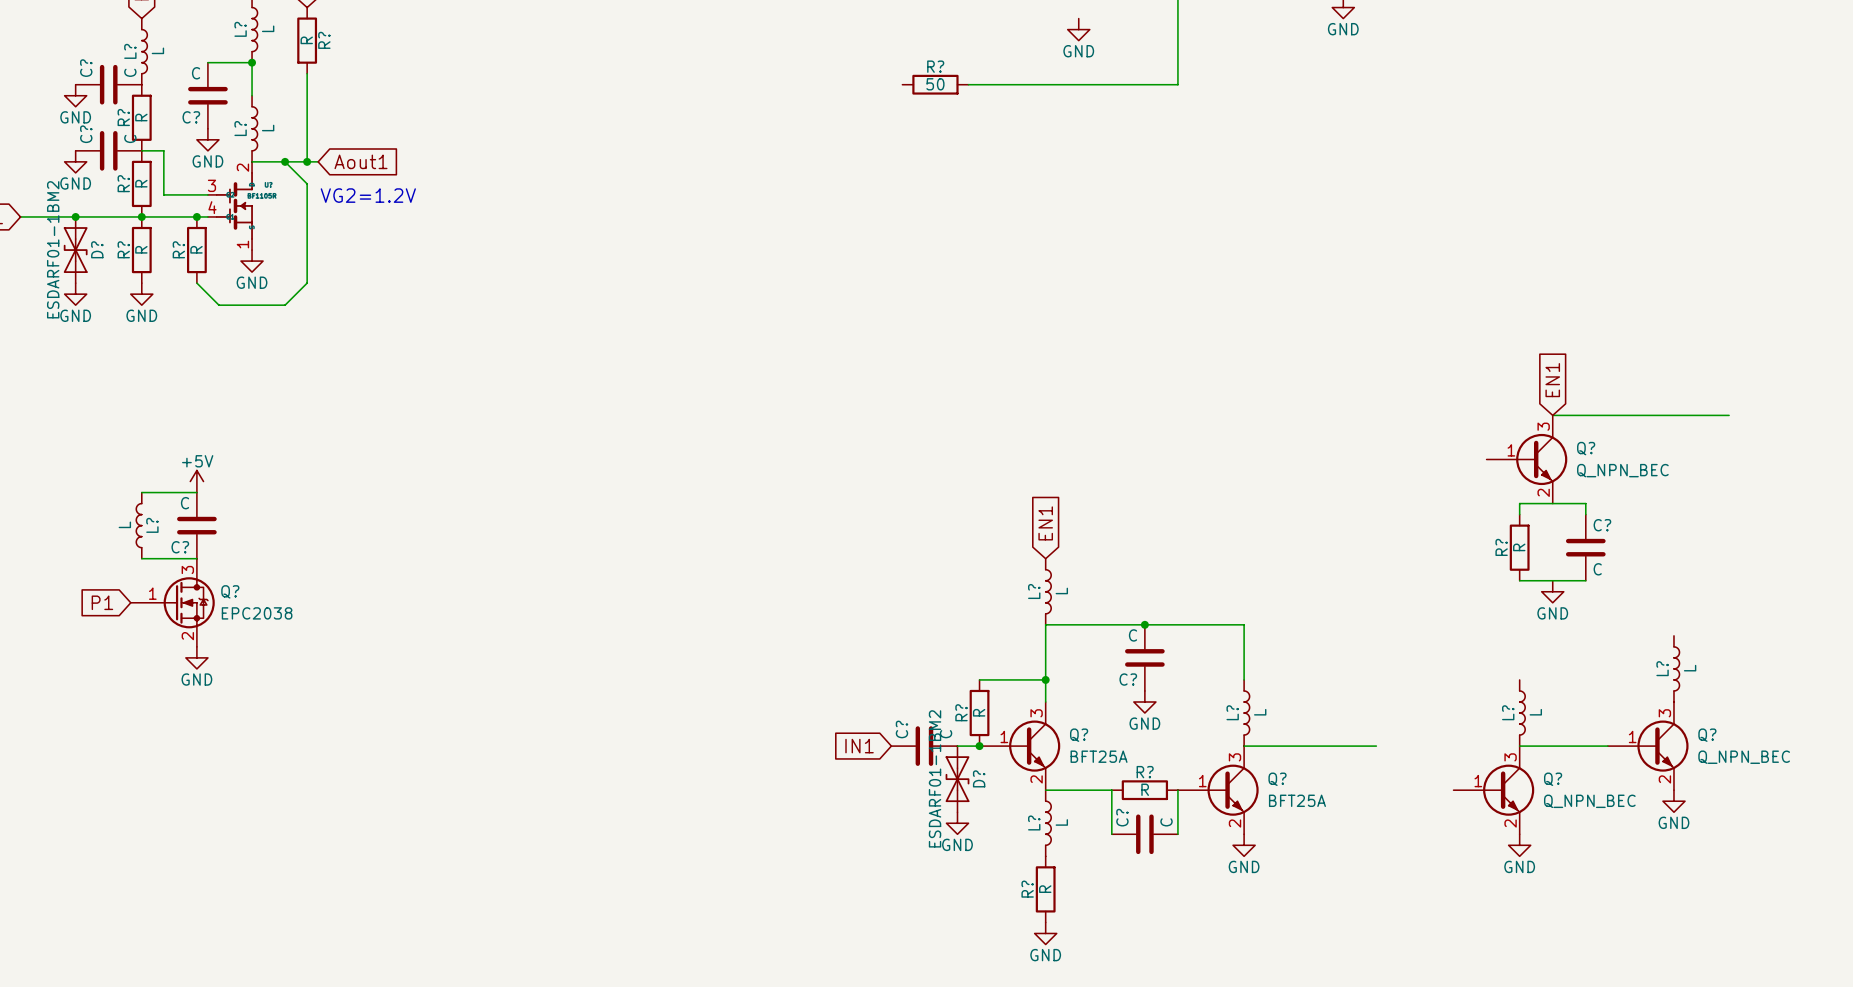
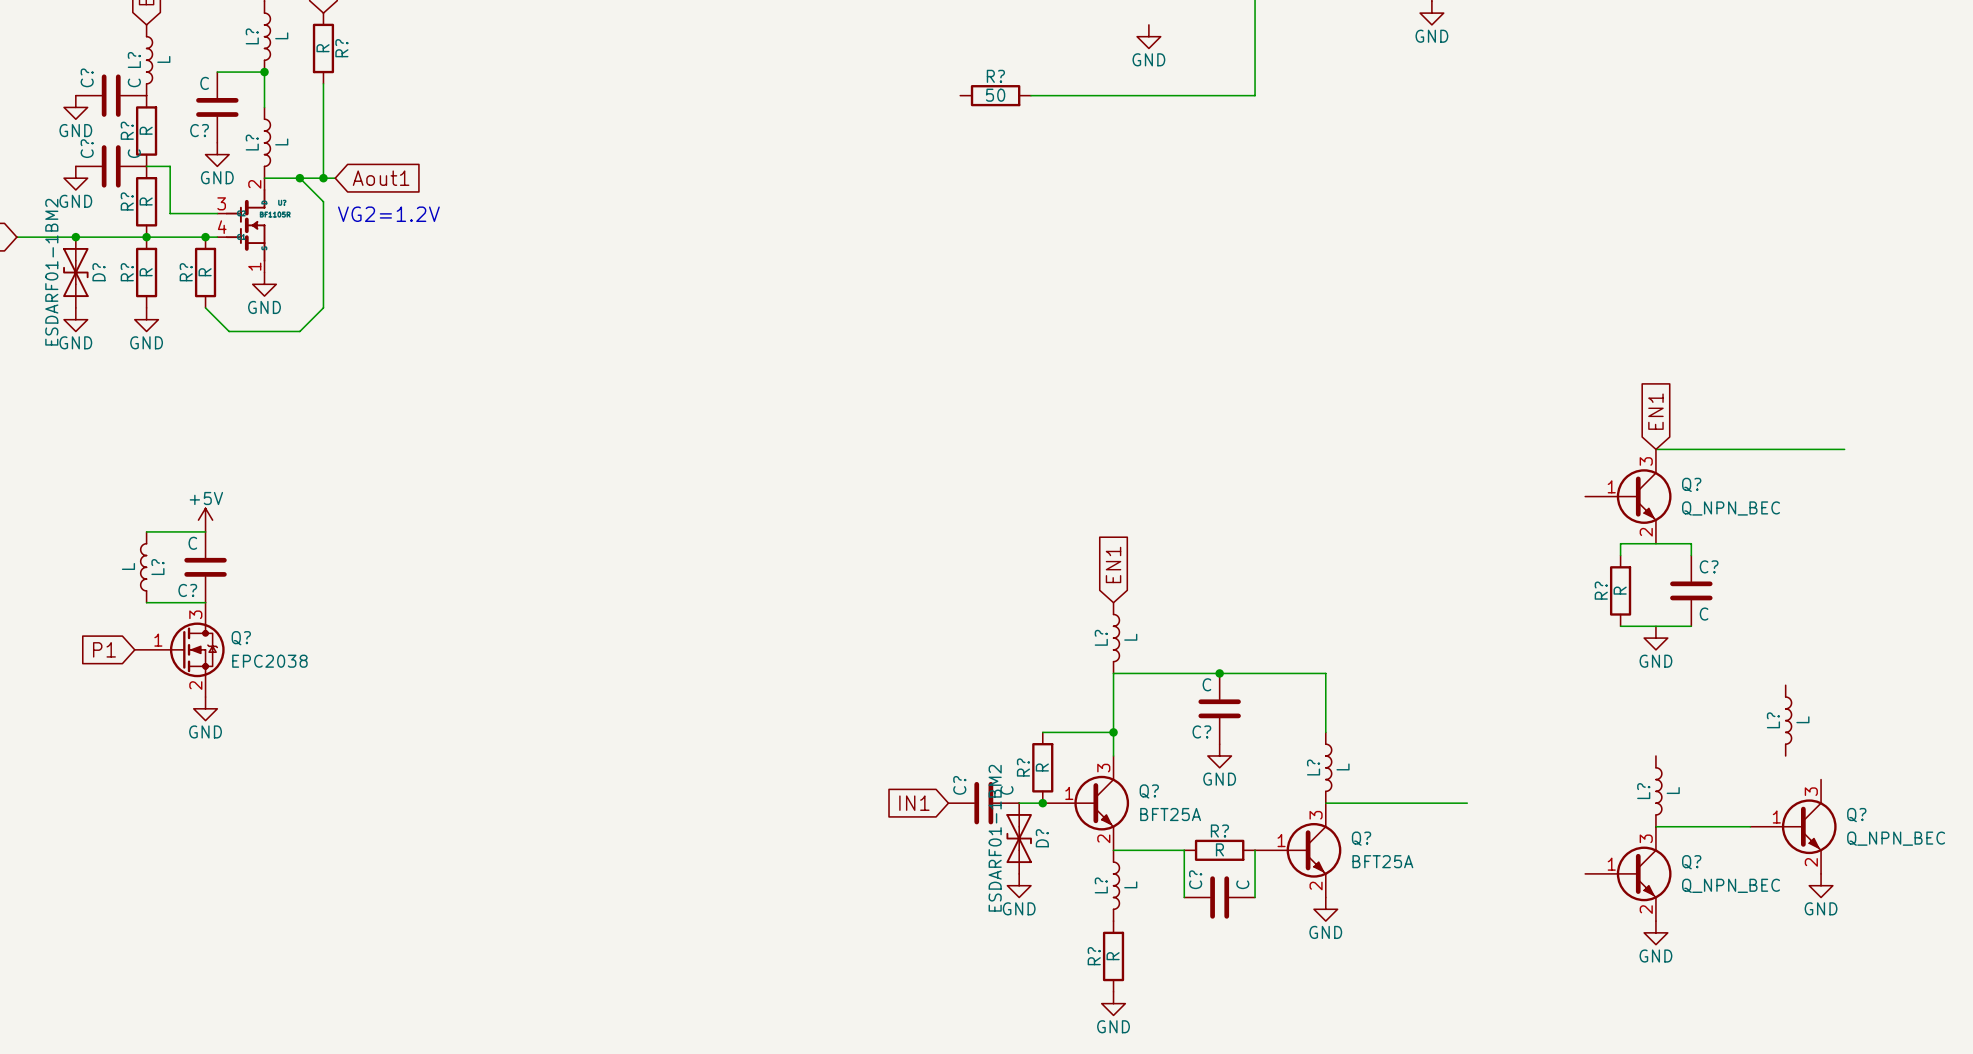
L? position: (1522, 713) -> (1658, 791)
wire: (1519, 746) (1607, 746) -> (1655, 826) (1750, 826)
Q? position: (1648, 746) -> (1793, 826)
Q? position: (1493, 790) -> (1628, 873)
power symbol position: GND (1673, 801) -> GND (1821, 885)
power symbol position: GND (1519, 845) -> GND (1655, 932)

